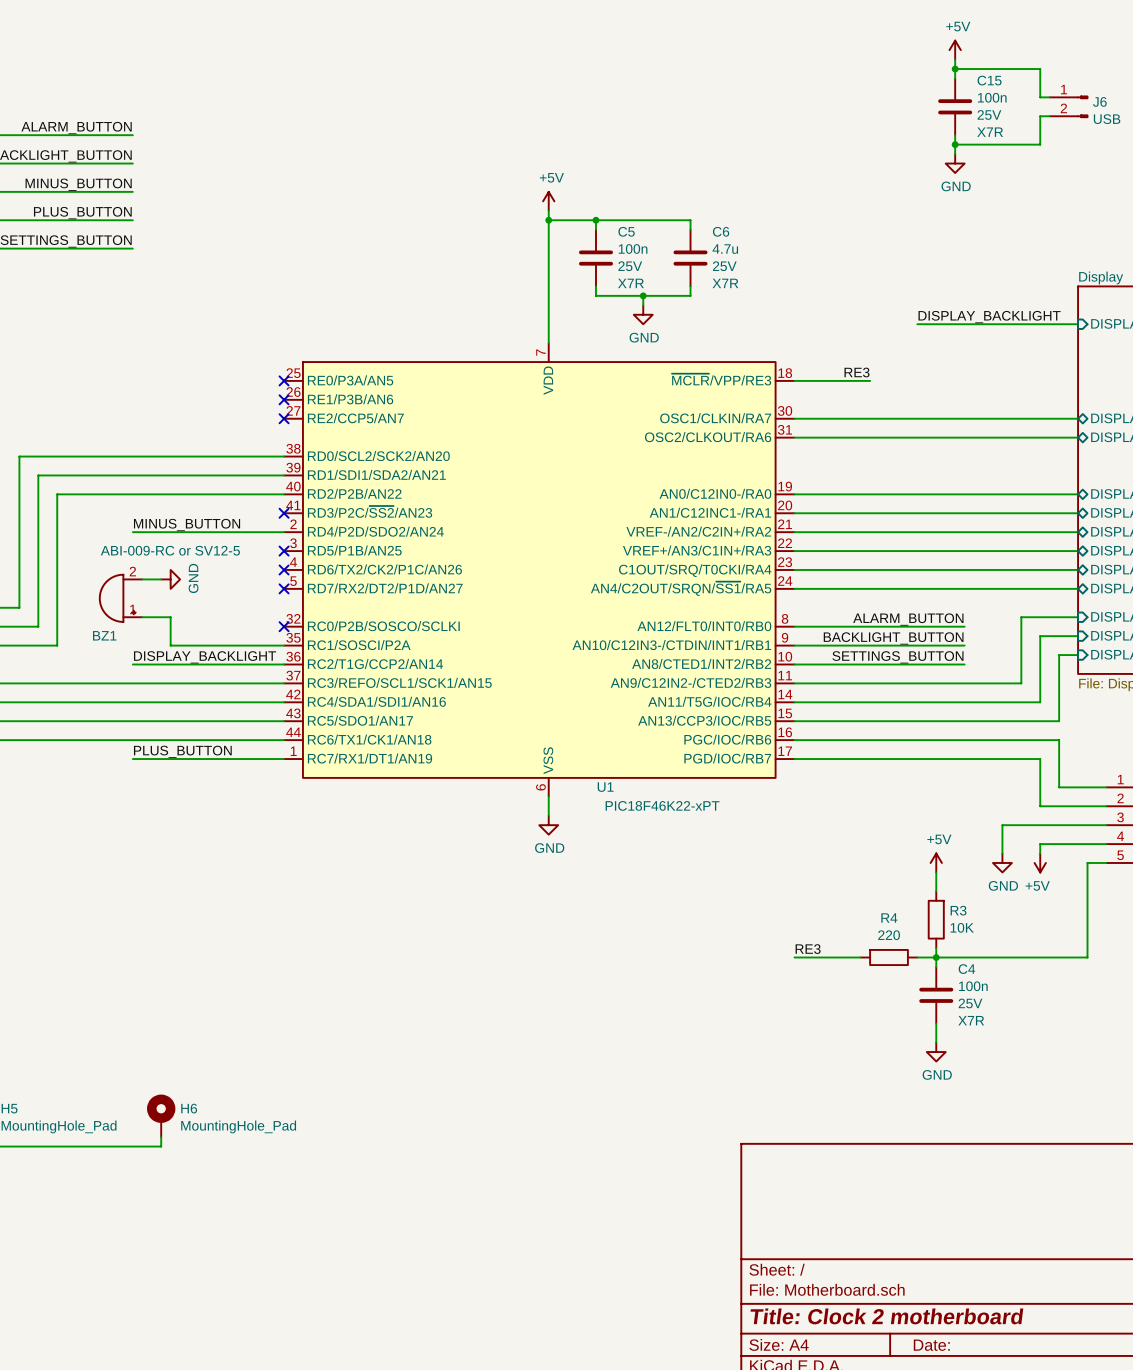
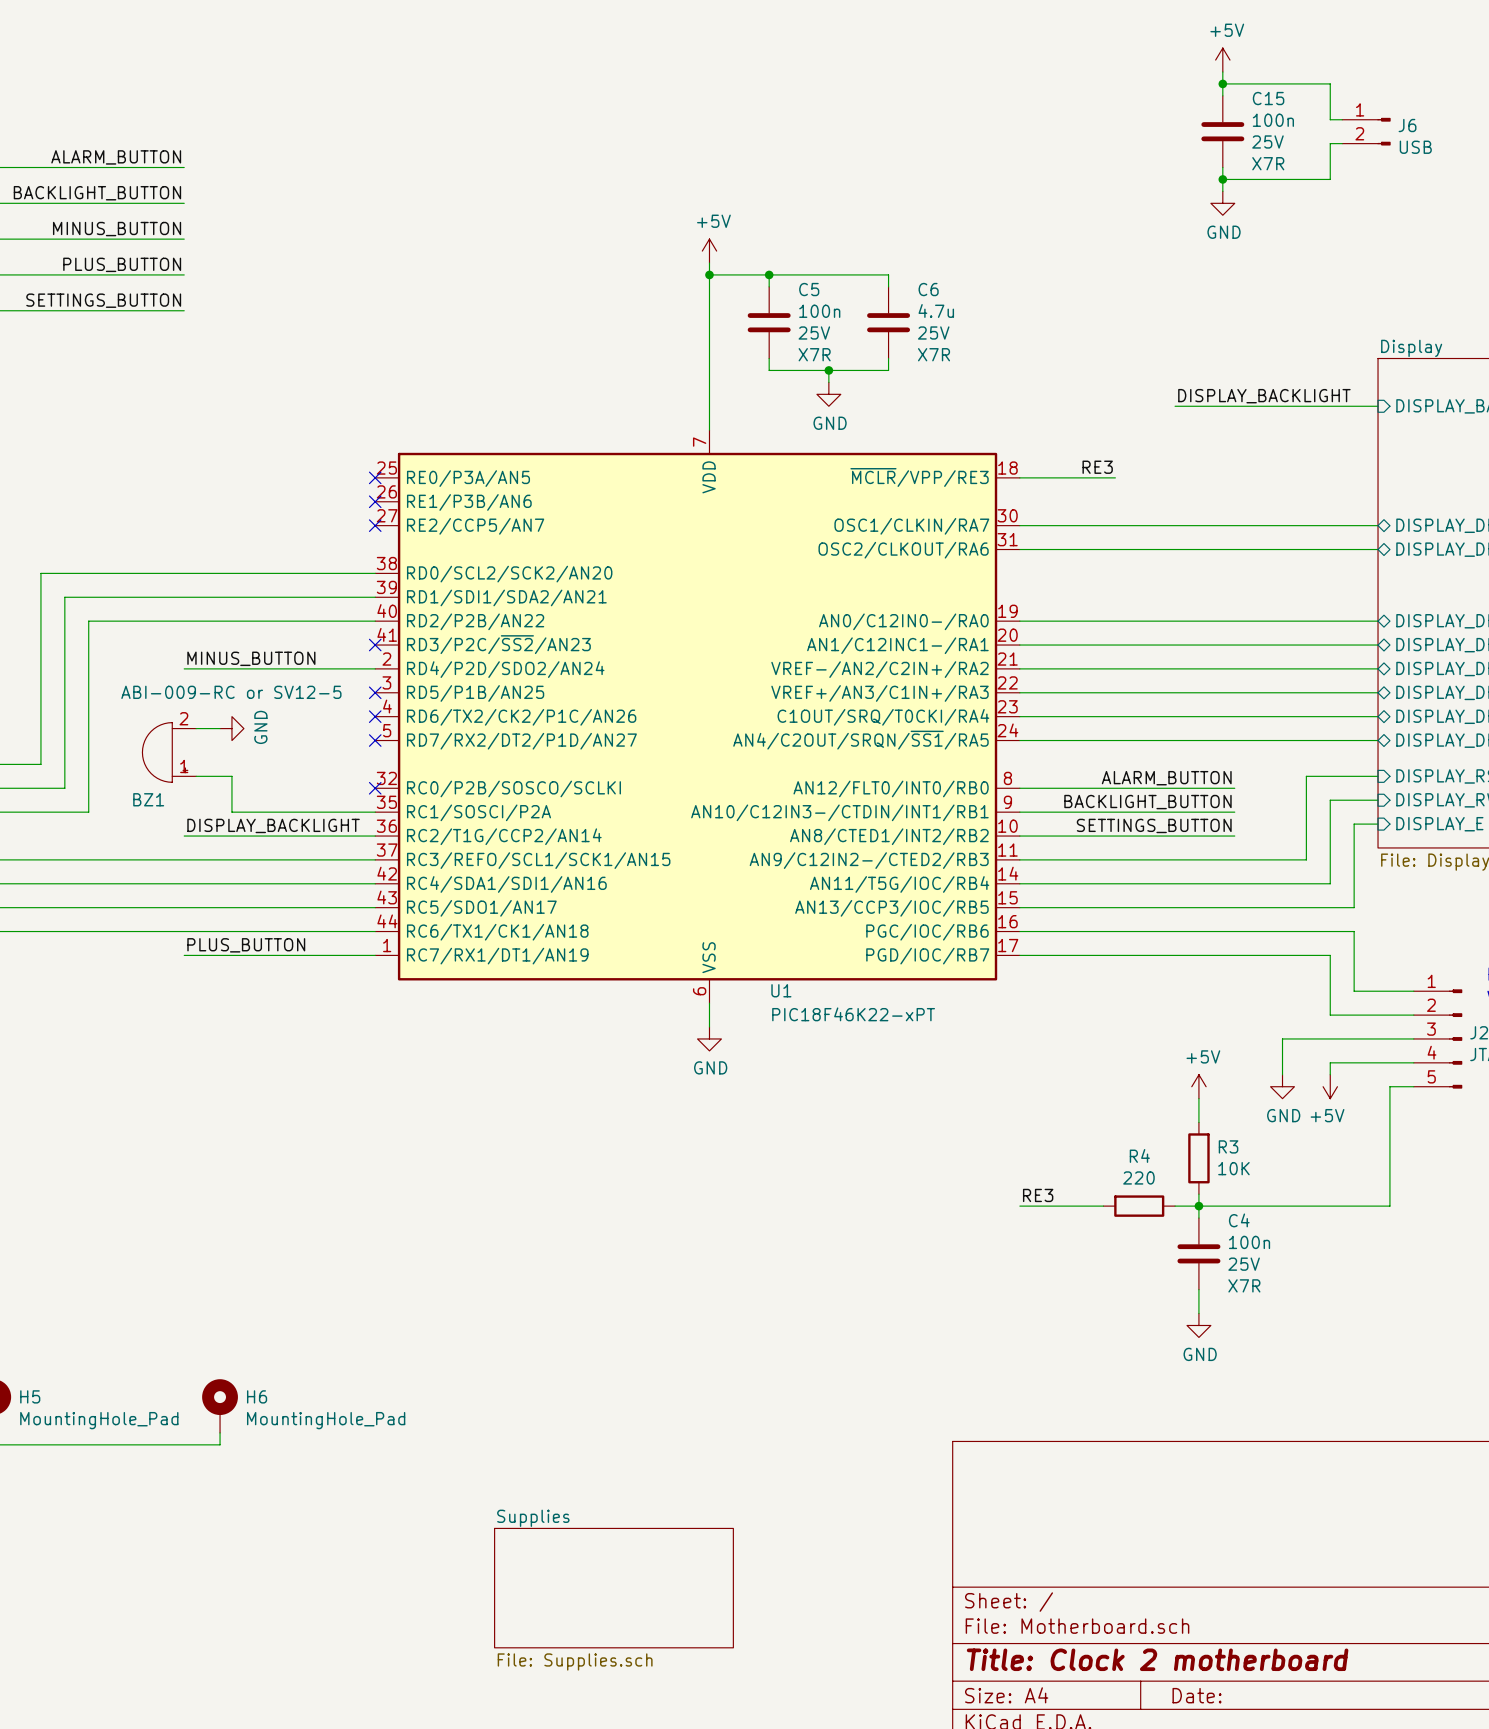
sheet Supplies: none -> File: Supplies.sch (613, 1588)

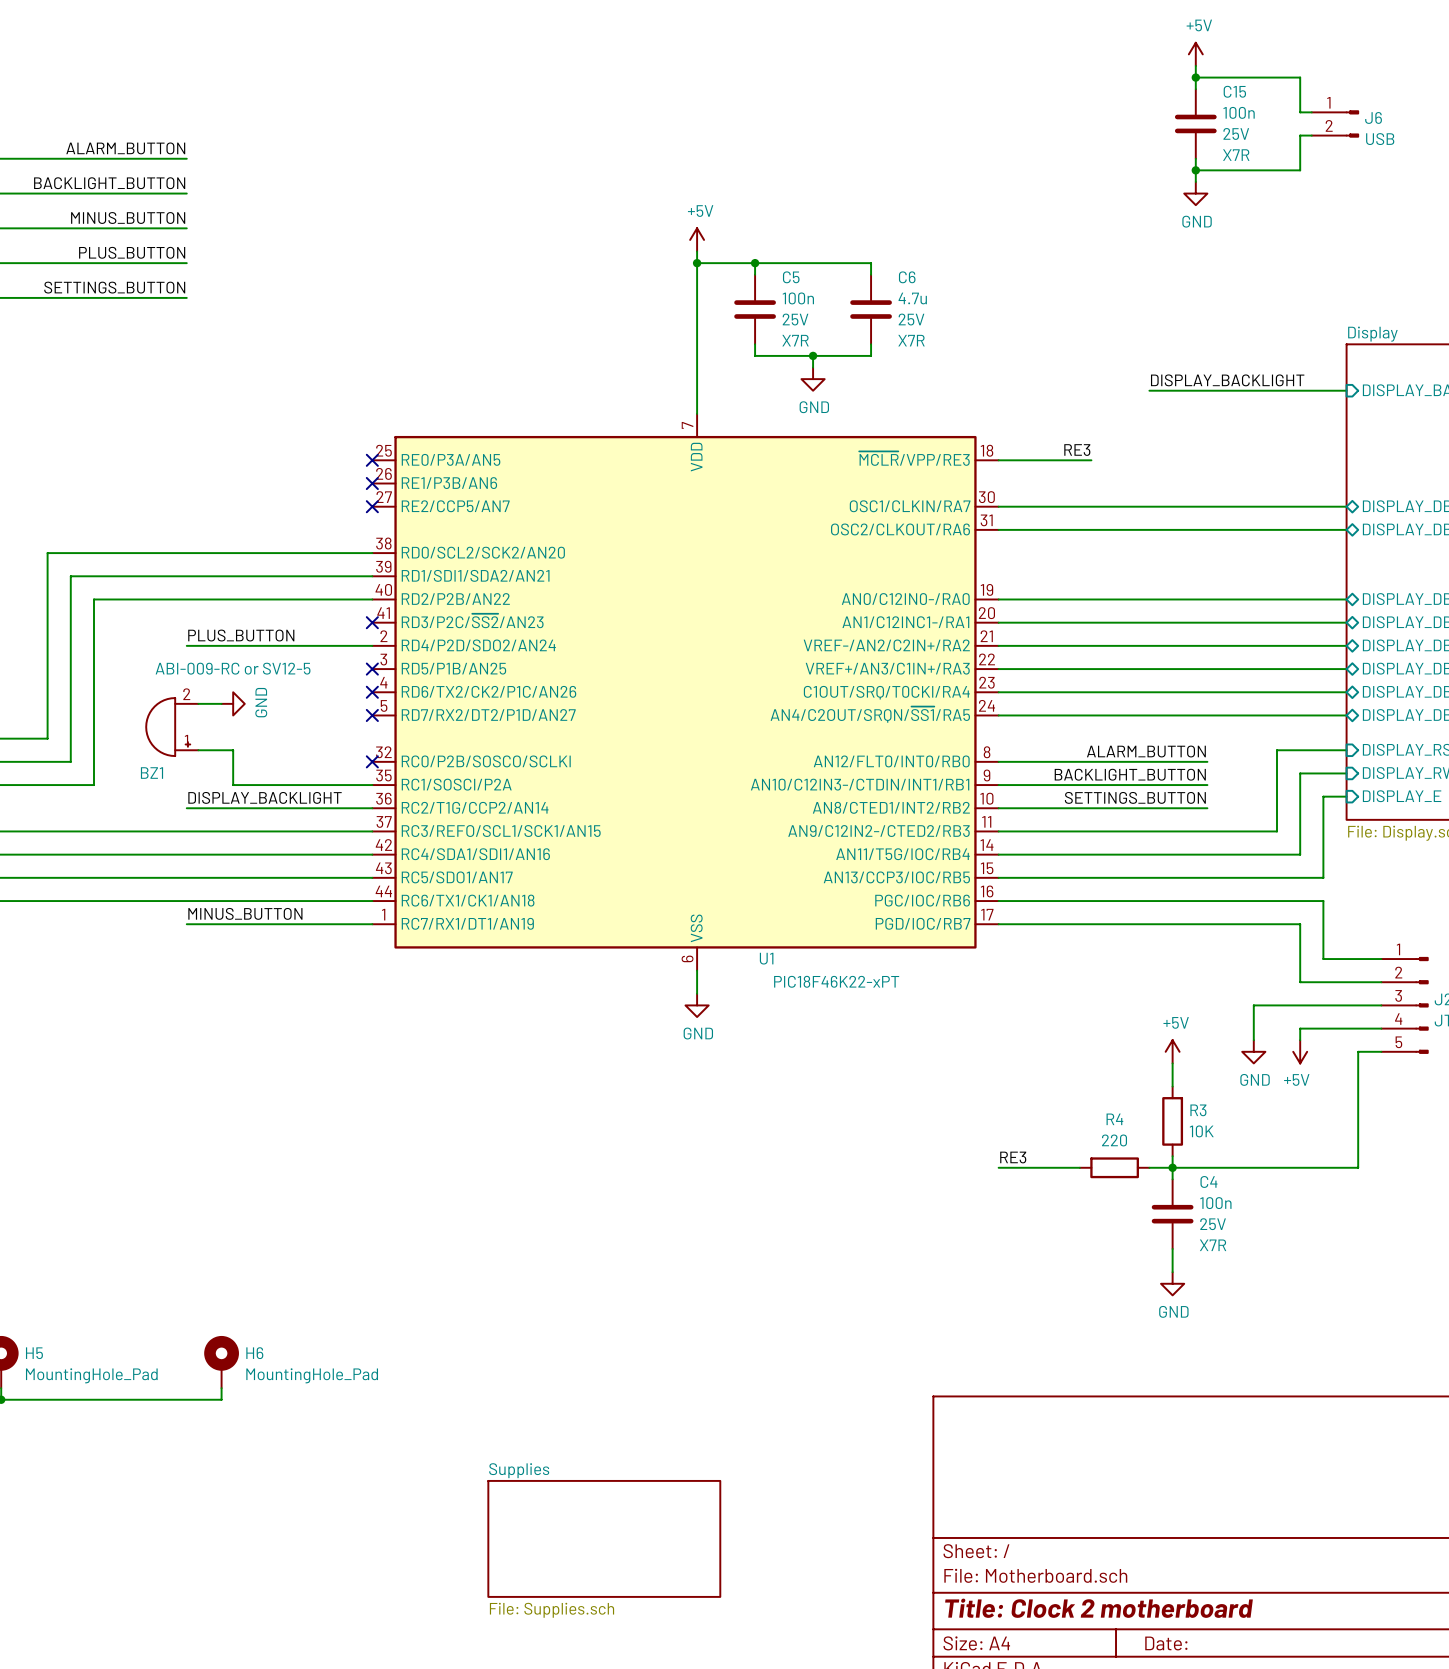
label: MINUS_BUTTON (251, 658) -> PLUS_BUTTON (241, 635)
label: PLUS_BUTTON (246, 945) -> MINUS_BUTTON (245, 913)

